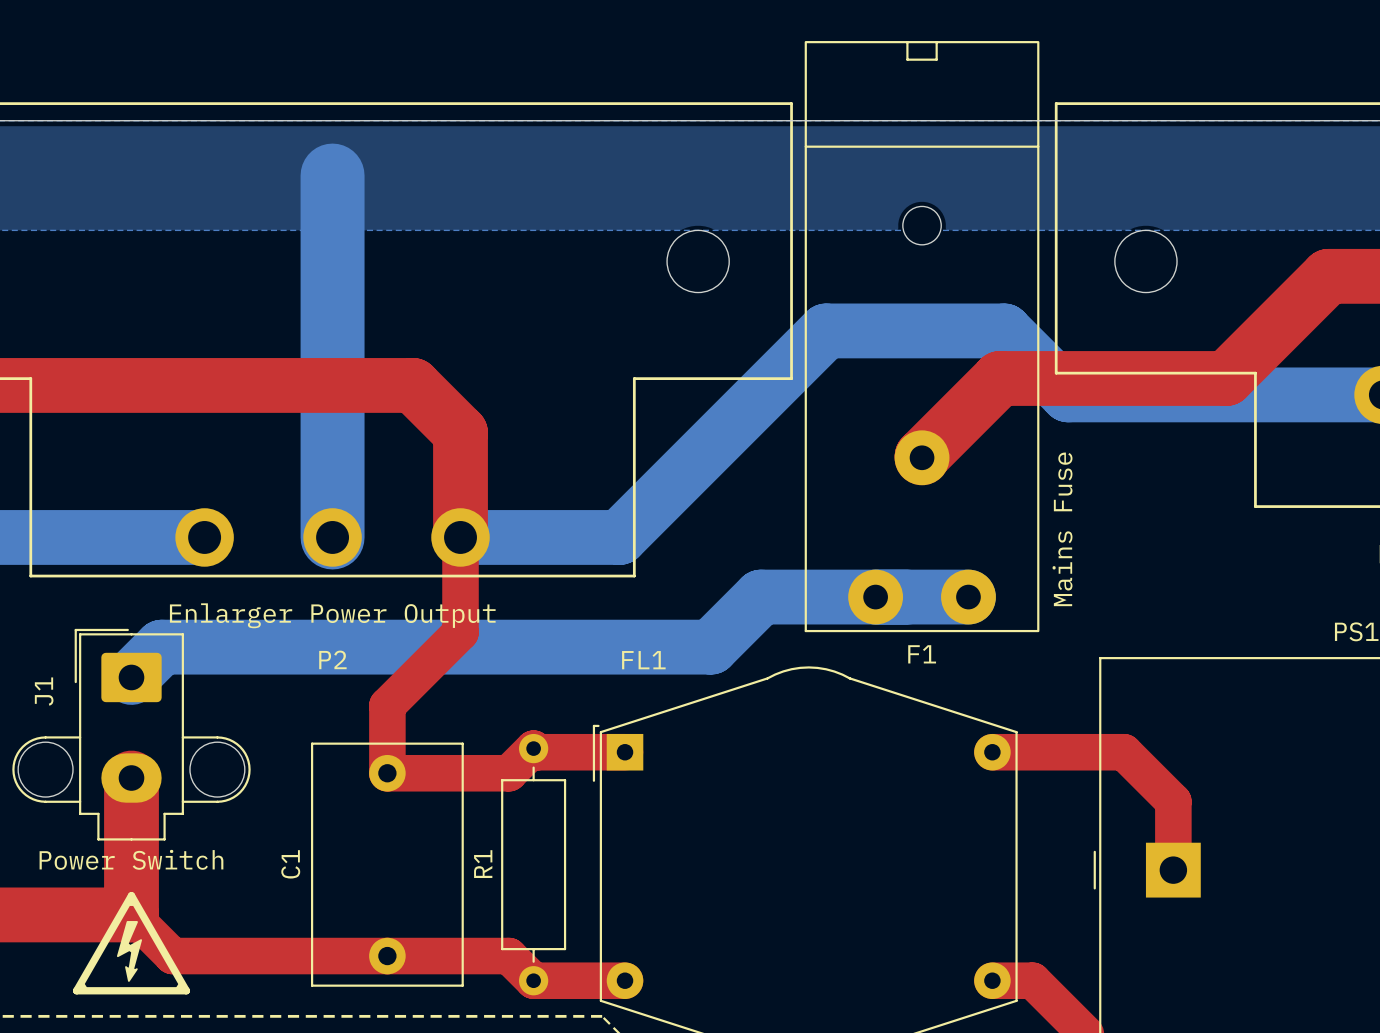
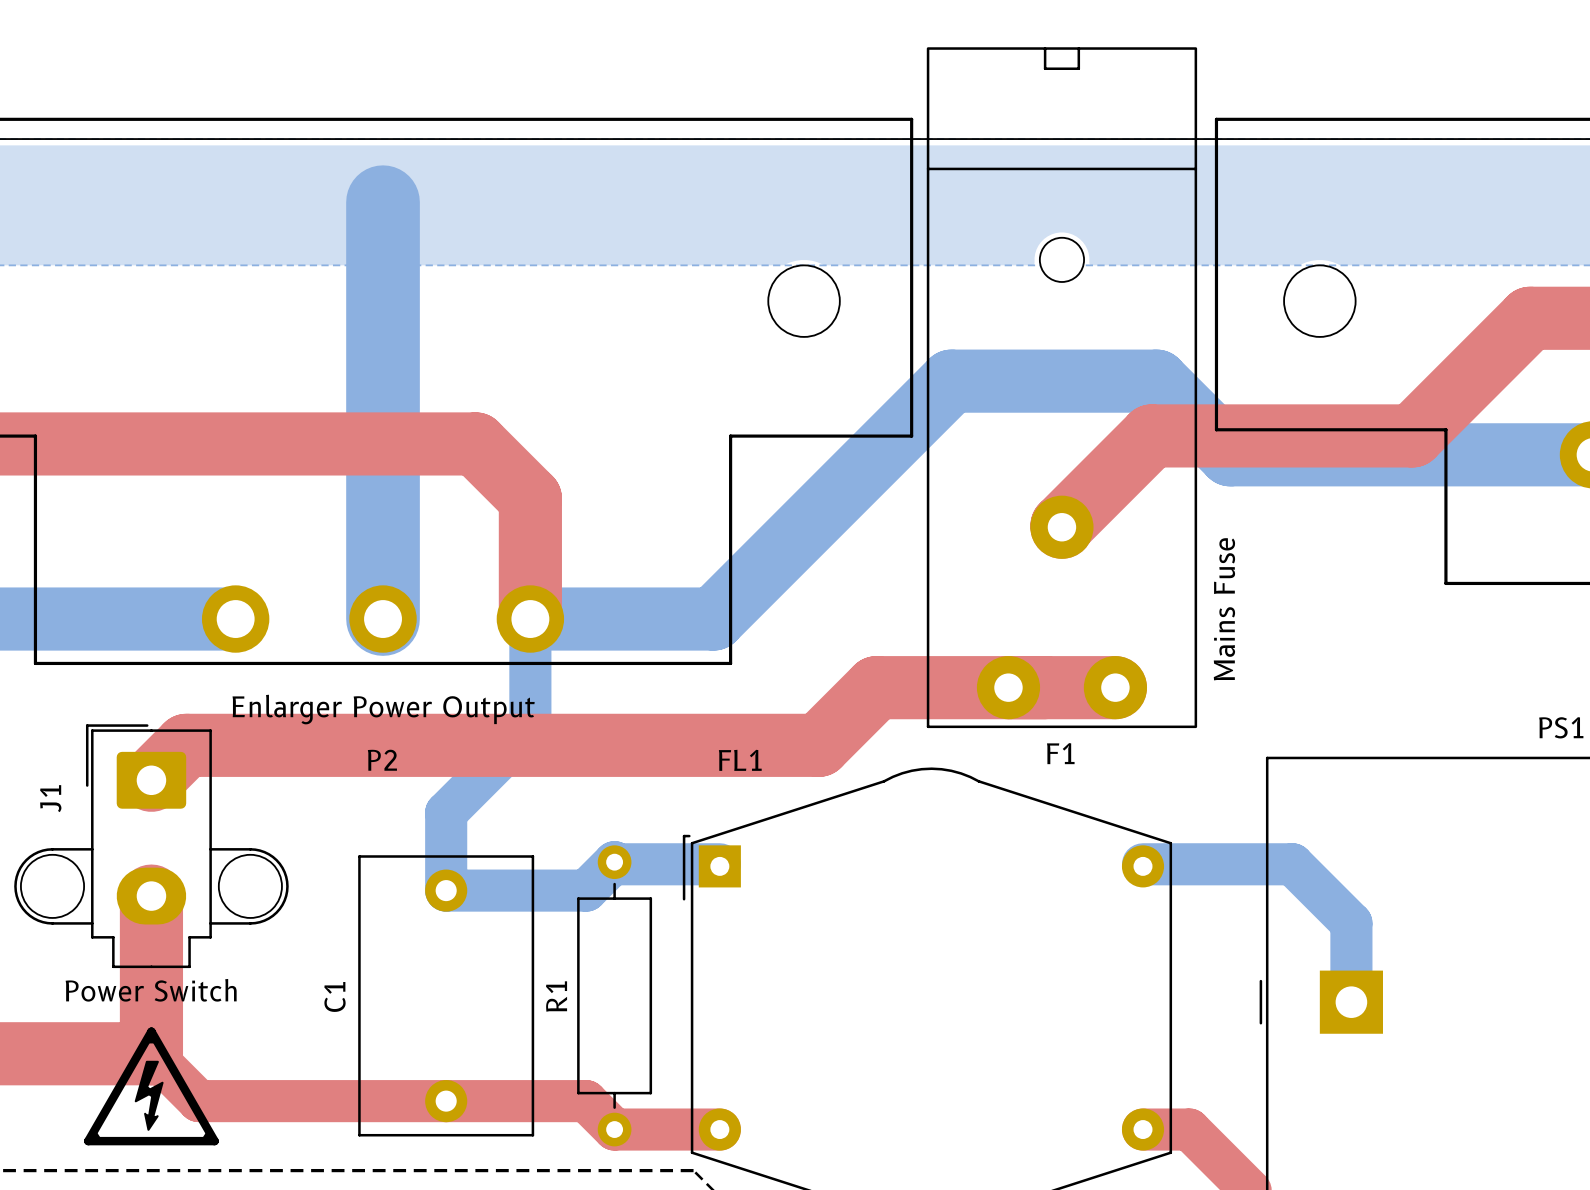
top track: (460, 537) (460, 632) (387, 705) (387, 773) (508, 773) (533, 748) (537, 752) (625, 752) -> none
bottom track: none -> (530, 619) (530, 728) (446, 812) (446, 890) (586, 890) (614, 862) (616, 864) (719, 864)
top track: none -> (1115, 687) (876, 687) (818, 745) (186, 745) (151, 780)
bottom track: (968, 597) (761, 597) (710, 647) (161, 647) (131, 677) -> none
bottom track: none -> (1143, 864) (1292, 864) (1351, 923) (1351, 1002)
top track: (992, 752) (1124, 752) (1173, 801) (1173, 870) -> none

